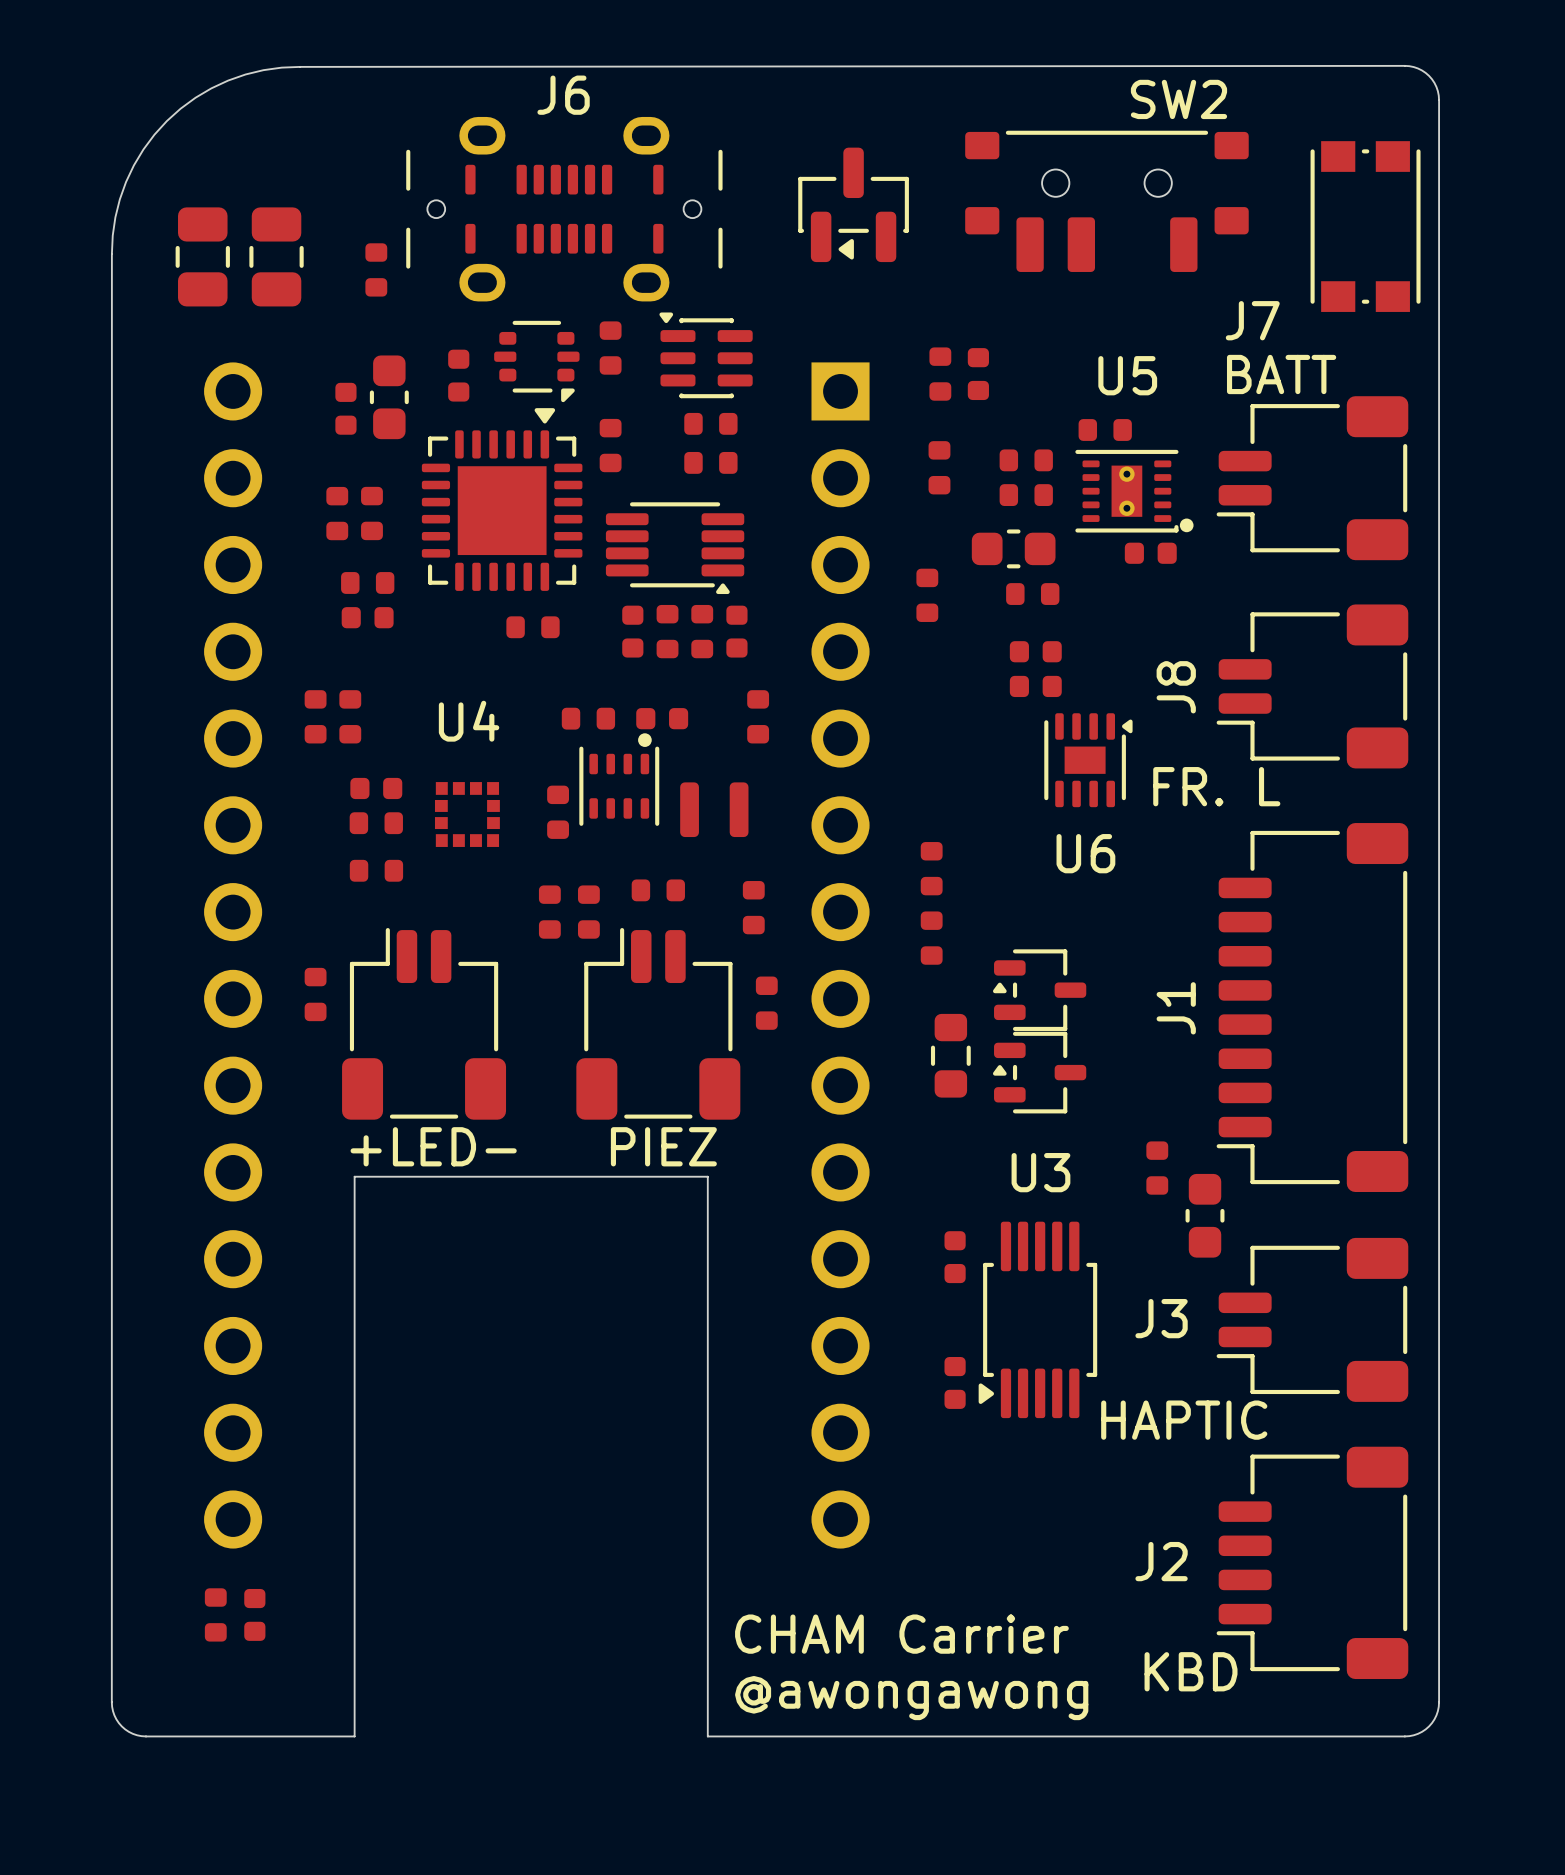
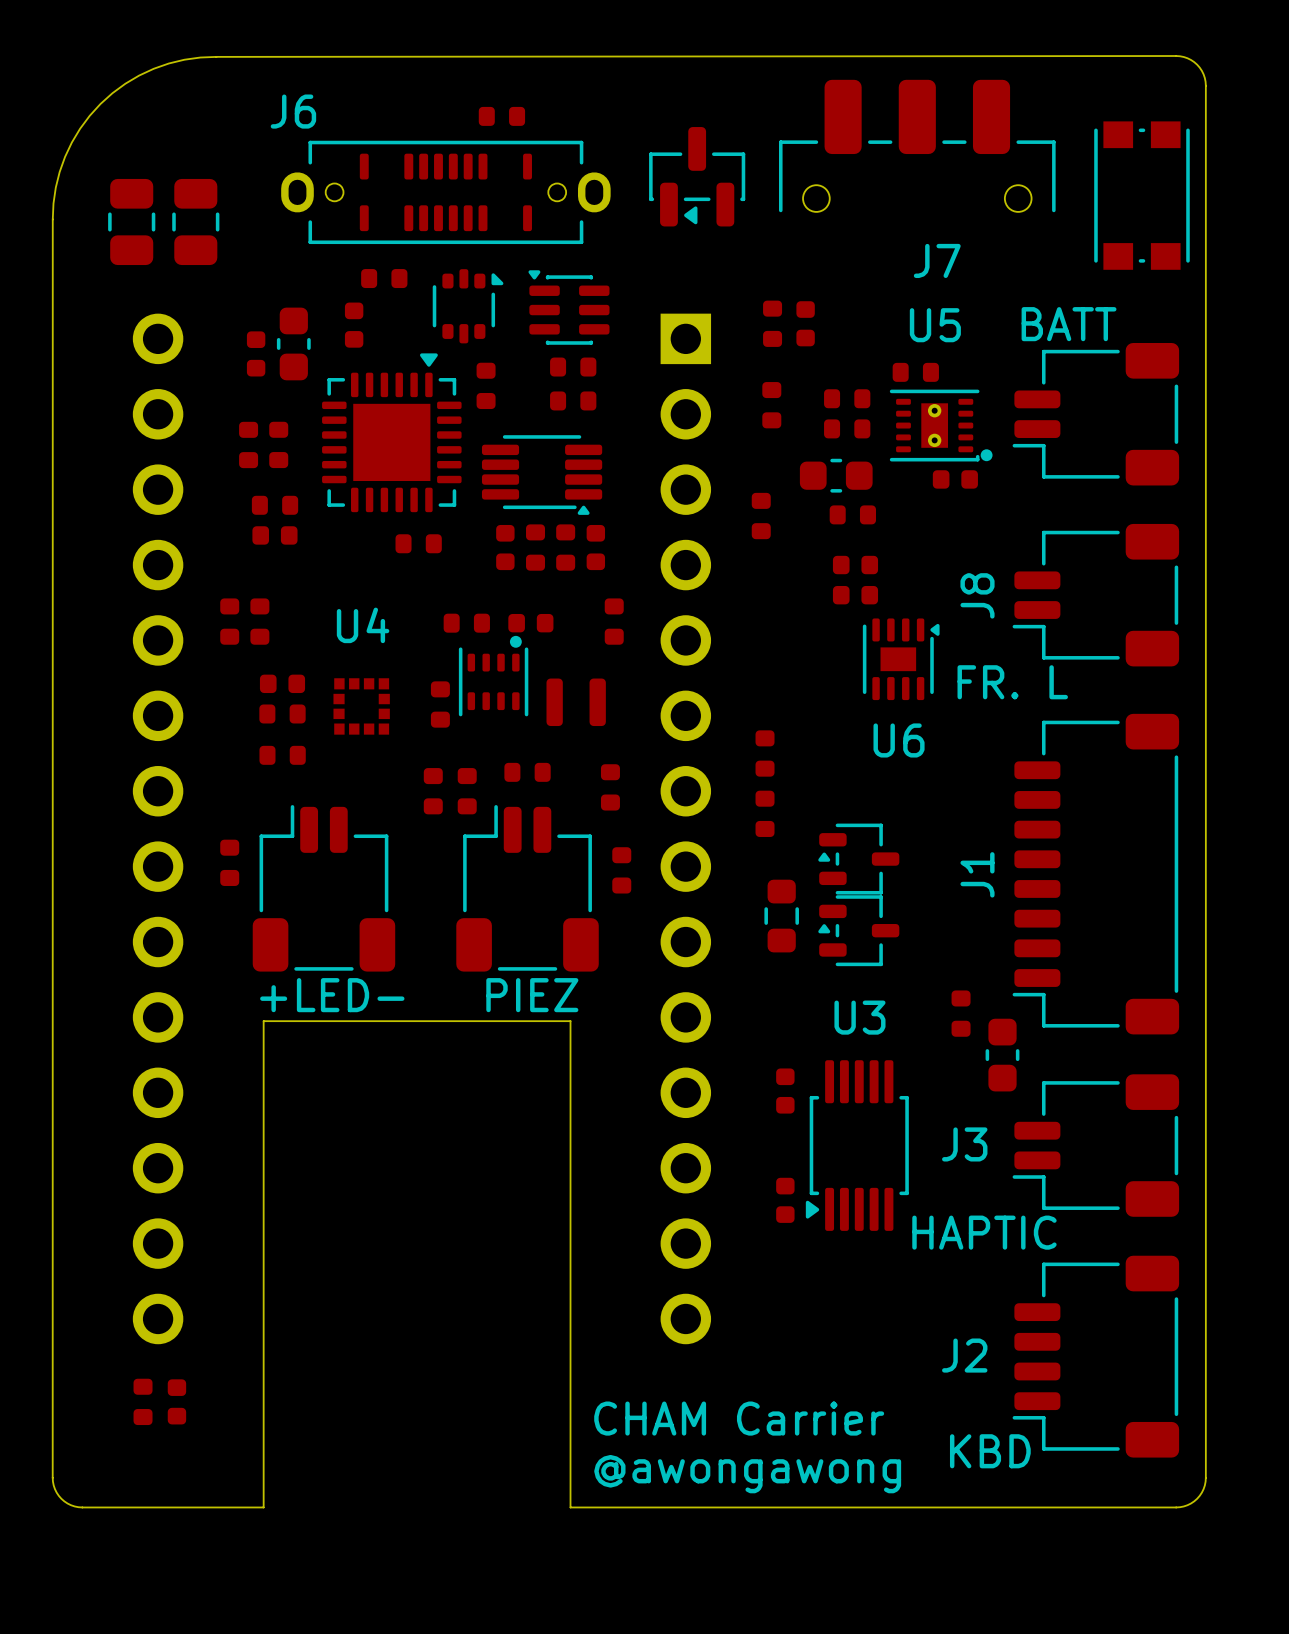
J6 name position: J6 (563, 95) -> J6 (293, 111)
J6 footprint: [406, 116, 723, 302] -> [281, 140, 611, 245]
part: none -> (501, 116)
part: none -> (917, 146)
SW2: (1106, 201) -> none
part rotation: 0° (376, 269) -> 90° clockwise (384, 278)
part position: (376, 269) -> (384, 278)
J7 name position: J7 (1252, 320) -> J7 (937, 260)
part footprint: [599, 321, 622, 375] -> [432, 269, 504, 344]
part: (536, 361) -> none

